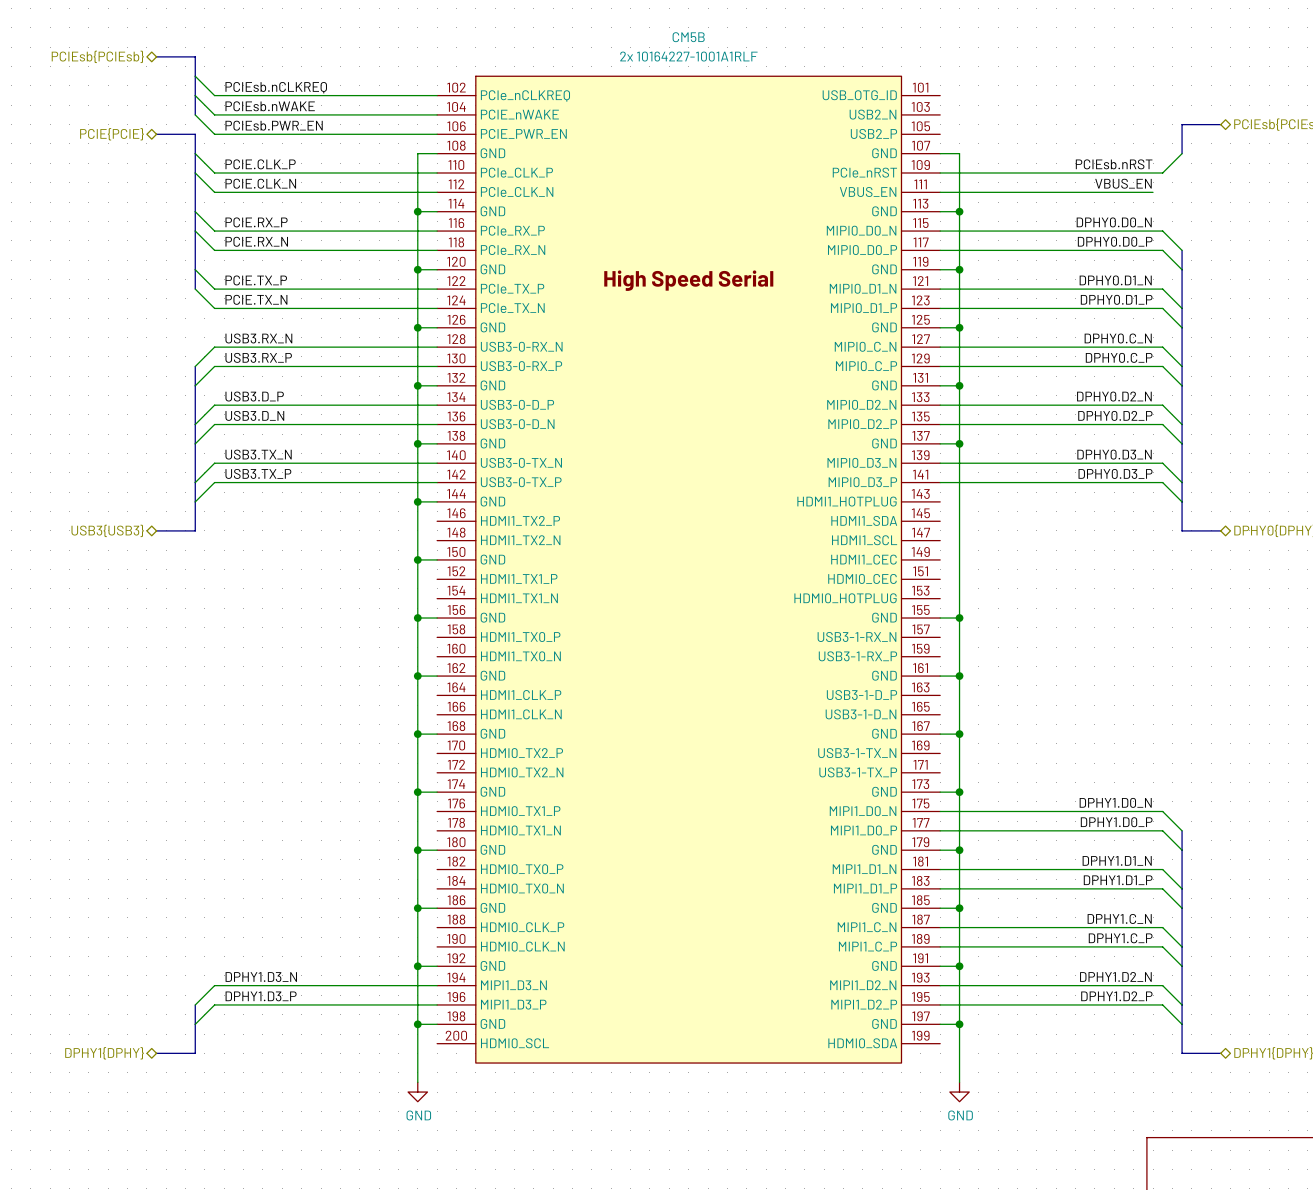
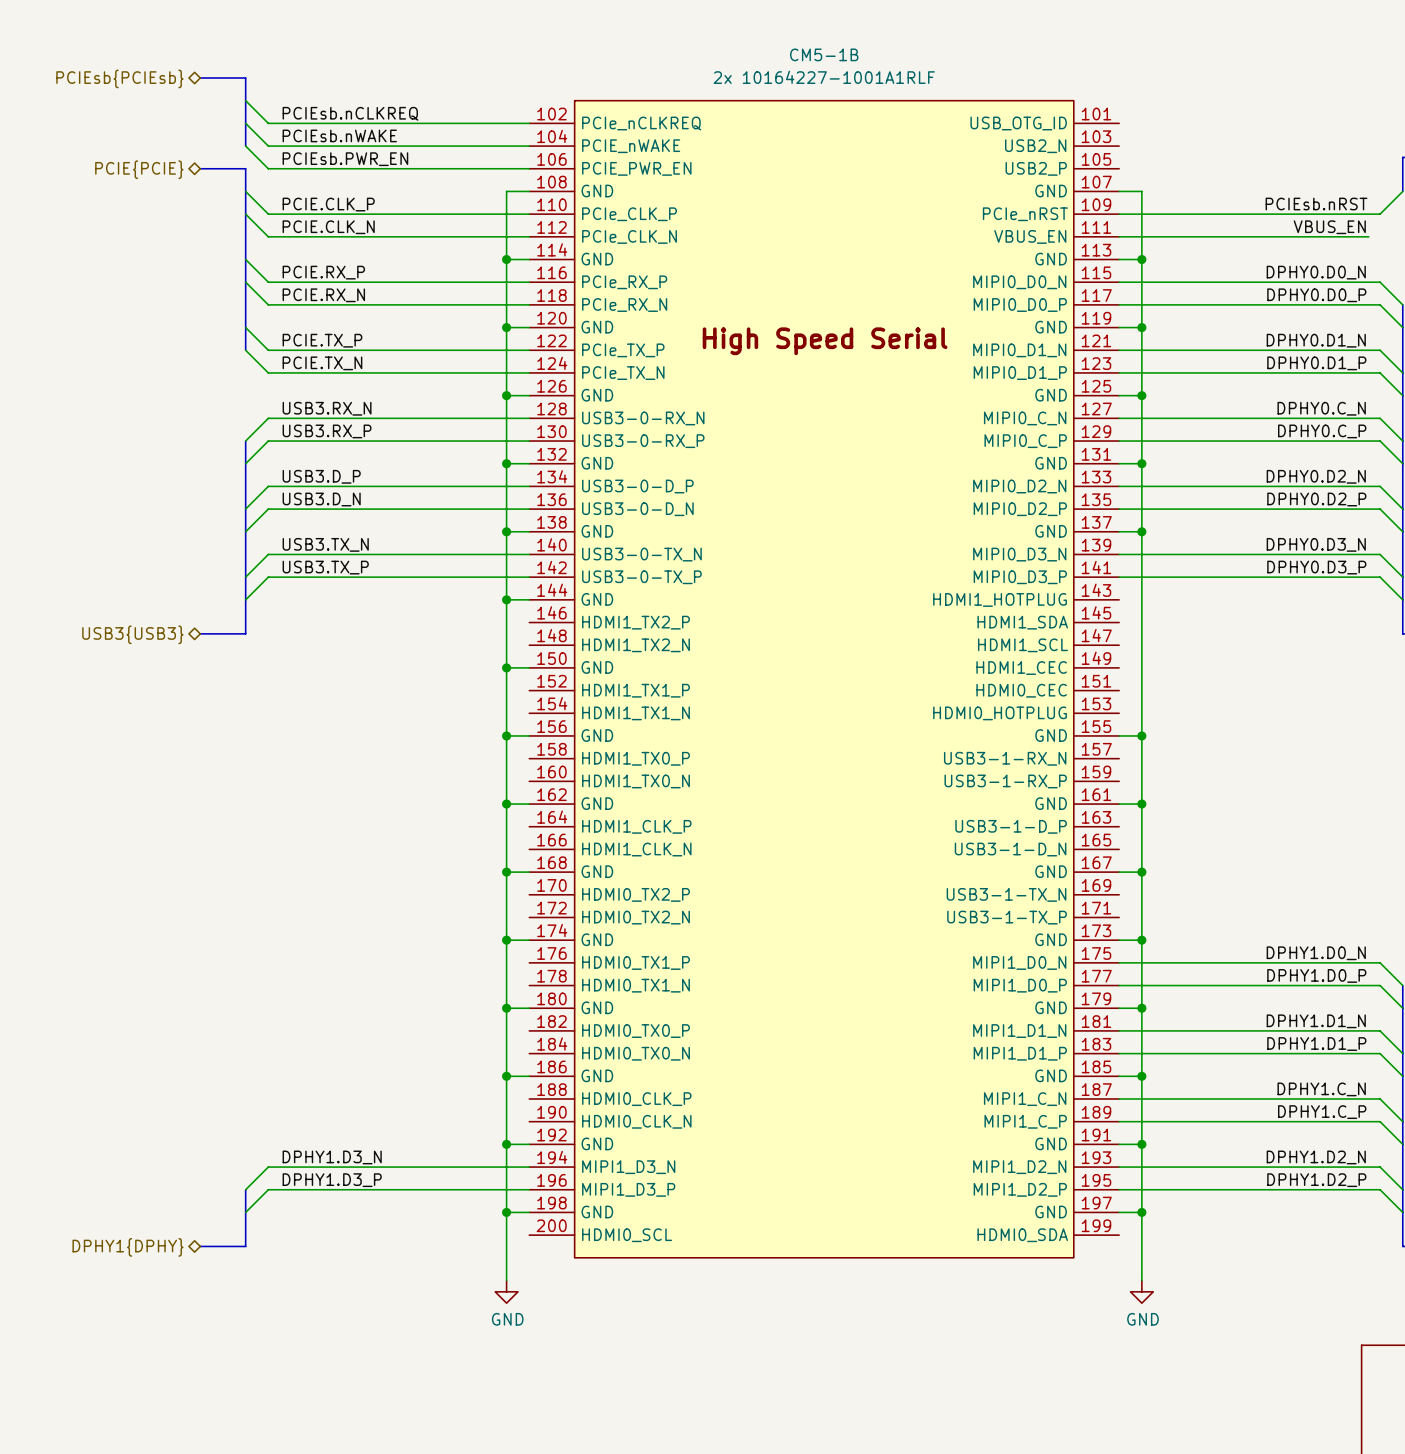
CM5B name: CM5B (688, 37) -> CM5-1B (824, 54)

